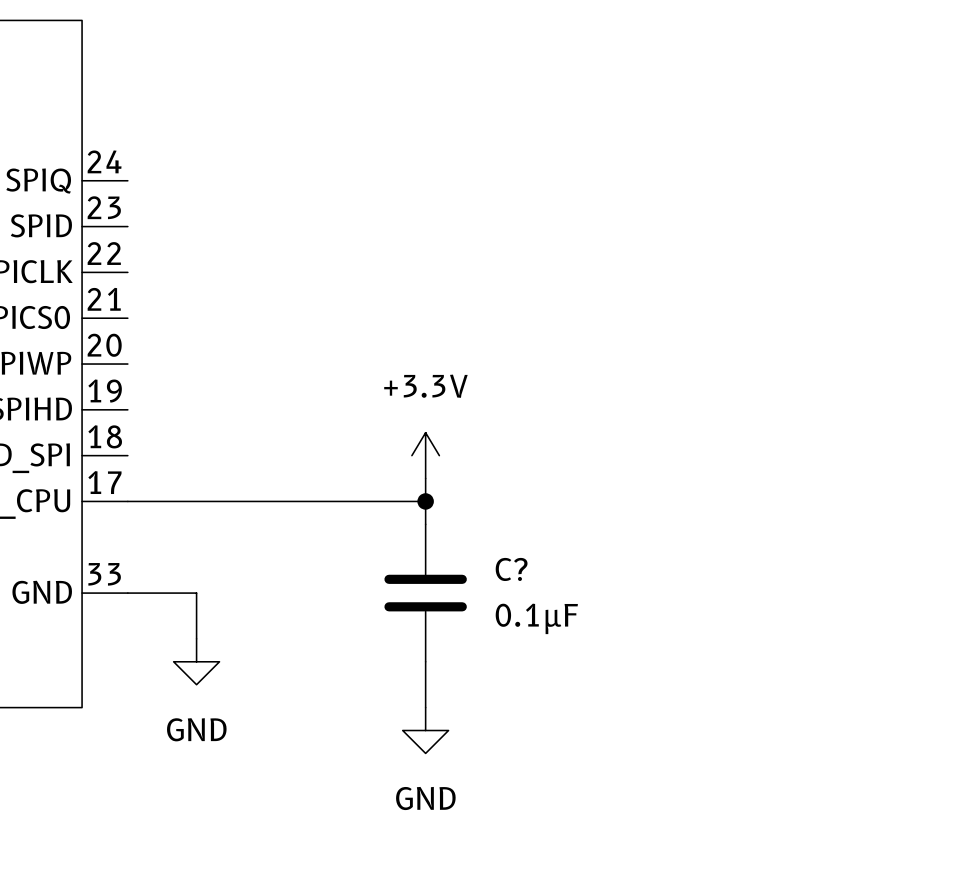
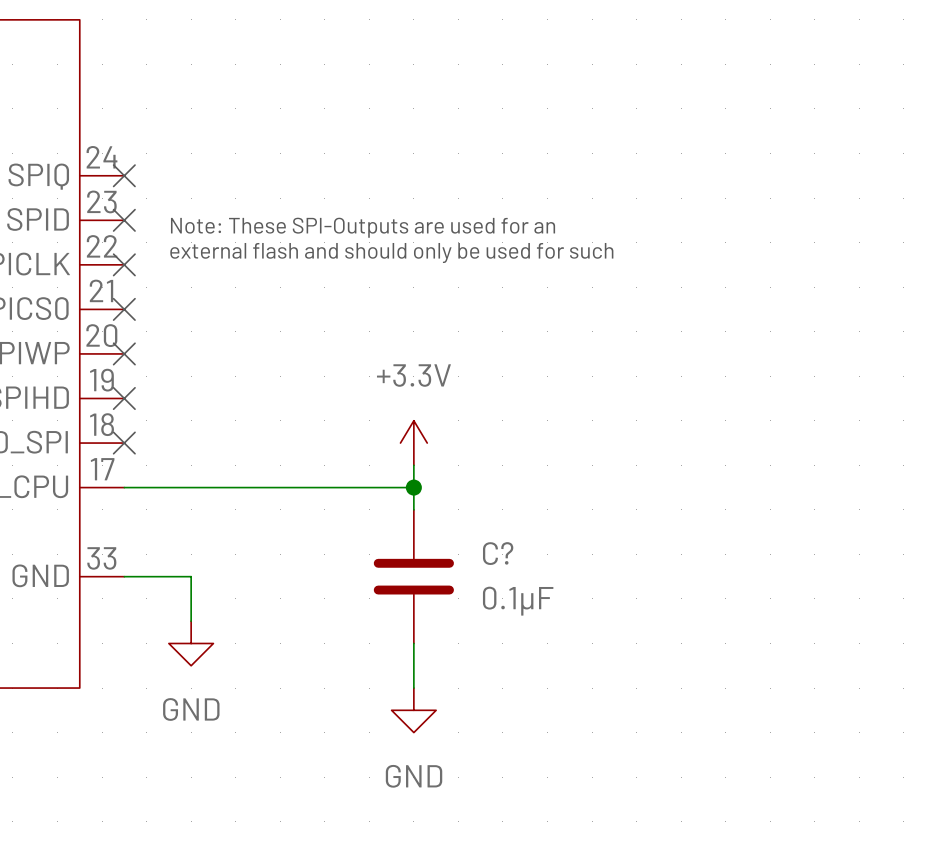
no-connect mark: none -> (124, 175)
no-connect mark: none -> (124, 220)
text: none -> Note: These SPI-Outputs are used for an (363, 227)
text: none -> external flash and should only be used for such (391, 253)
no-connect mark: none -> (124, 264)
no-connect mark: none -> (124, 309)
no-connect mark: none -> (124, 353)
no-connect mark: none -> (124, 398)
no-connect mark: none -> (124, 443)

